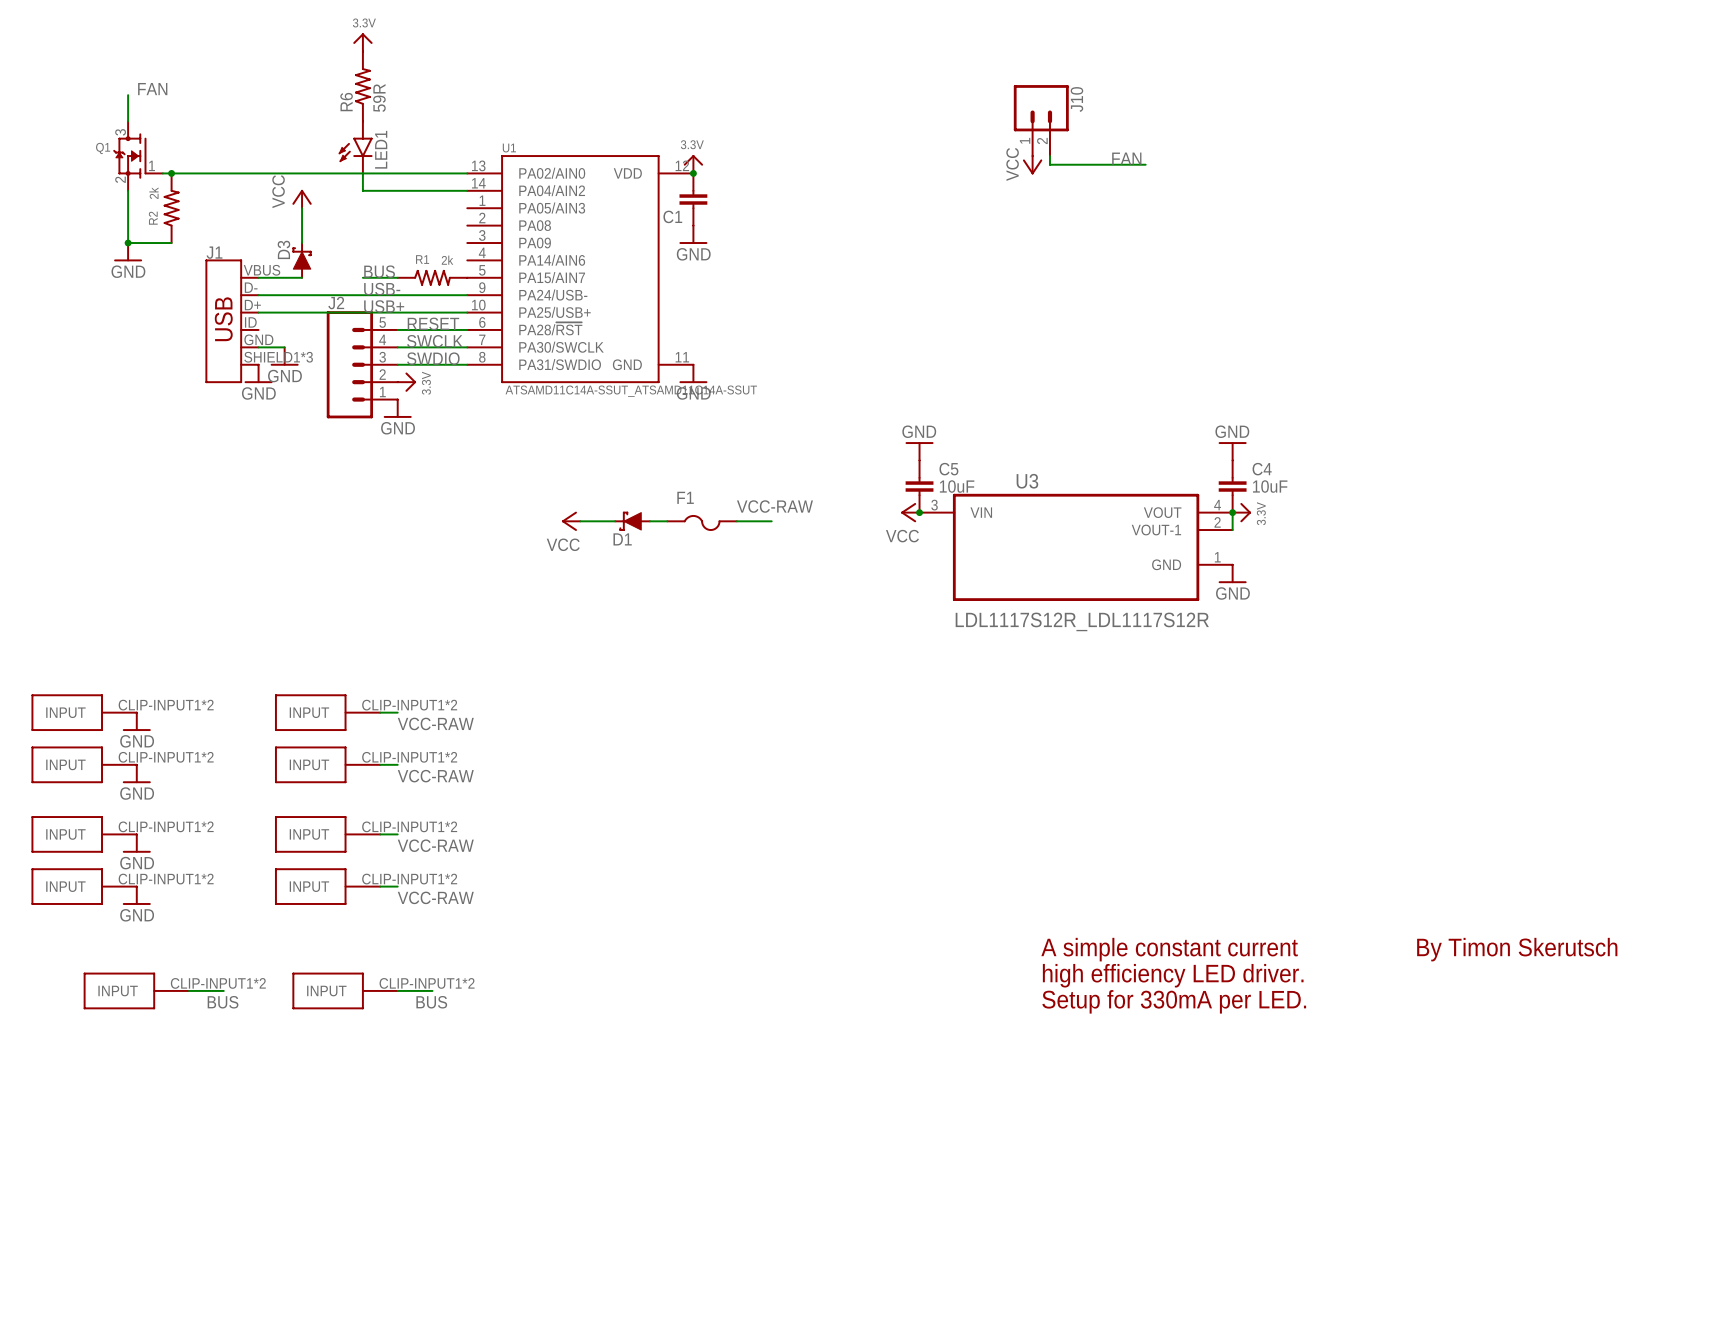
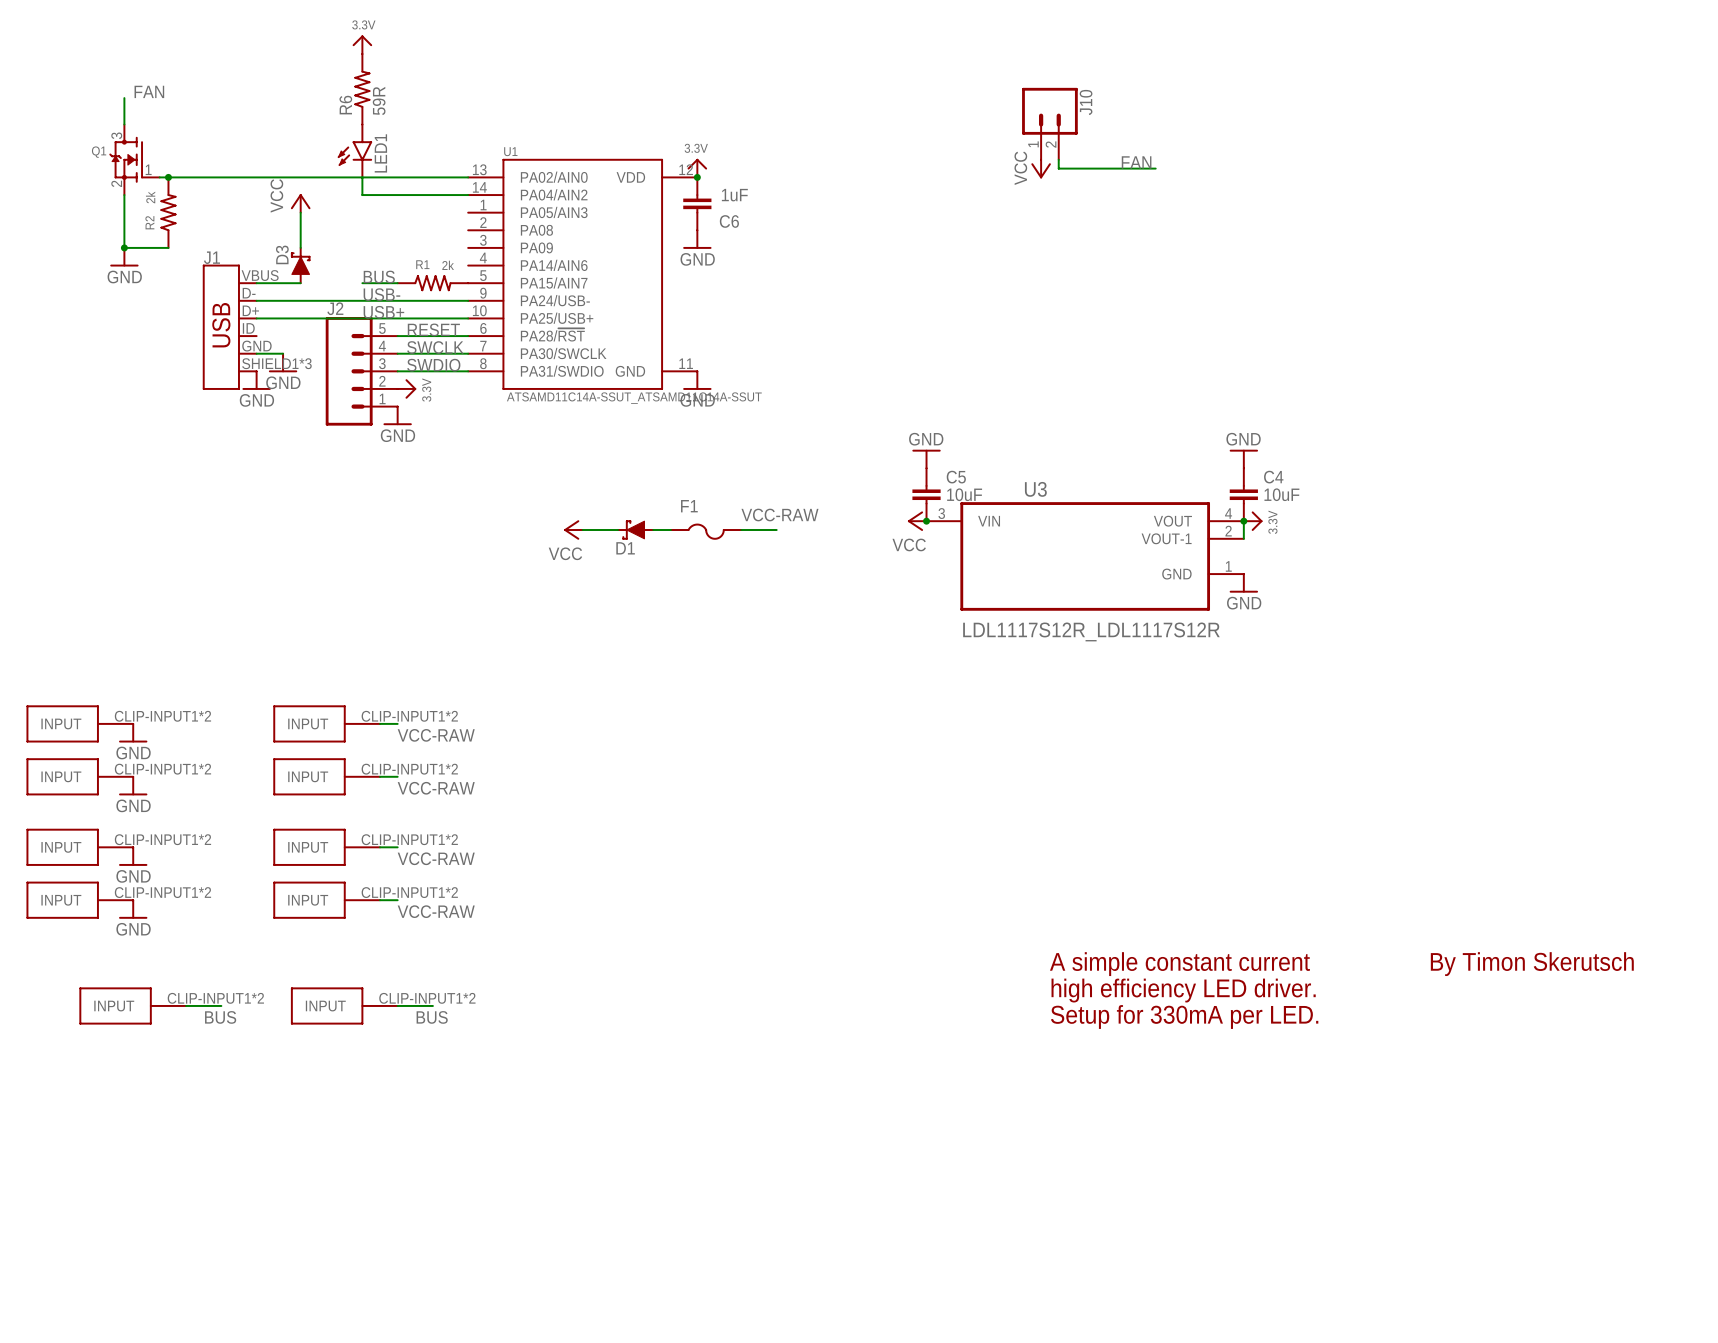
C1 value: none -> 1uF (734, 195)
C1 name: C1 (672, 216) -> C6 (729, 221)

